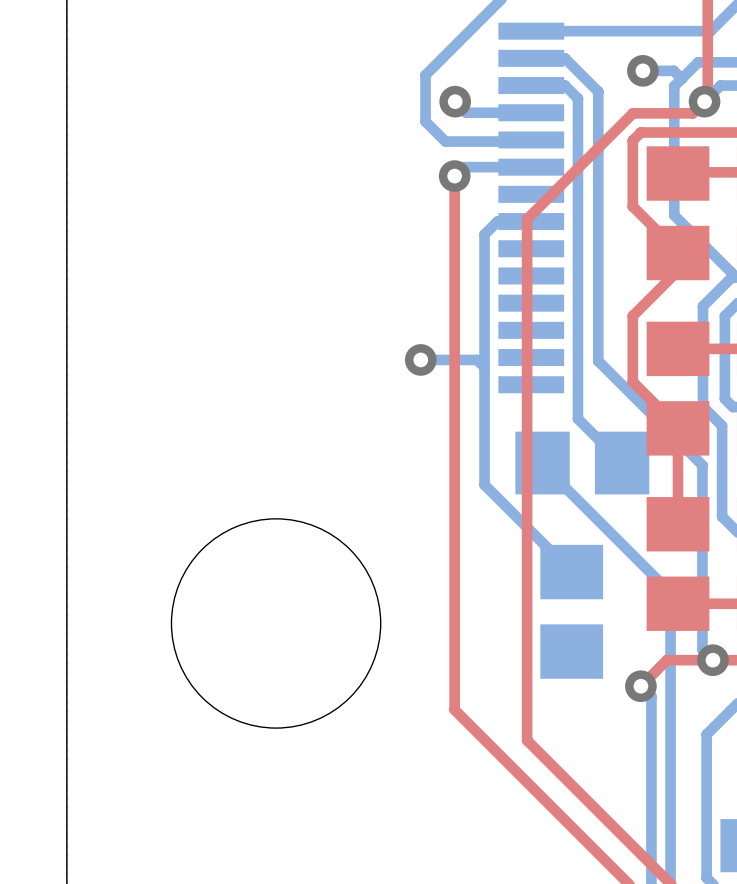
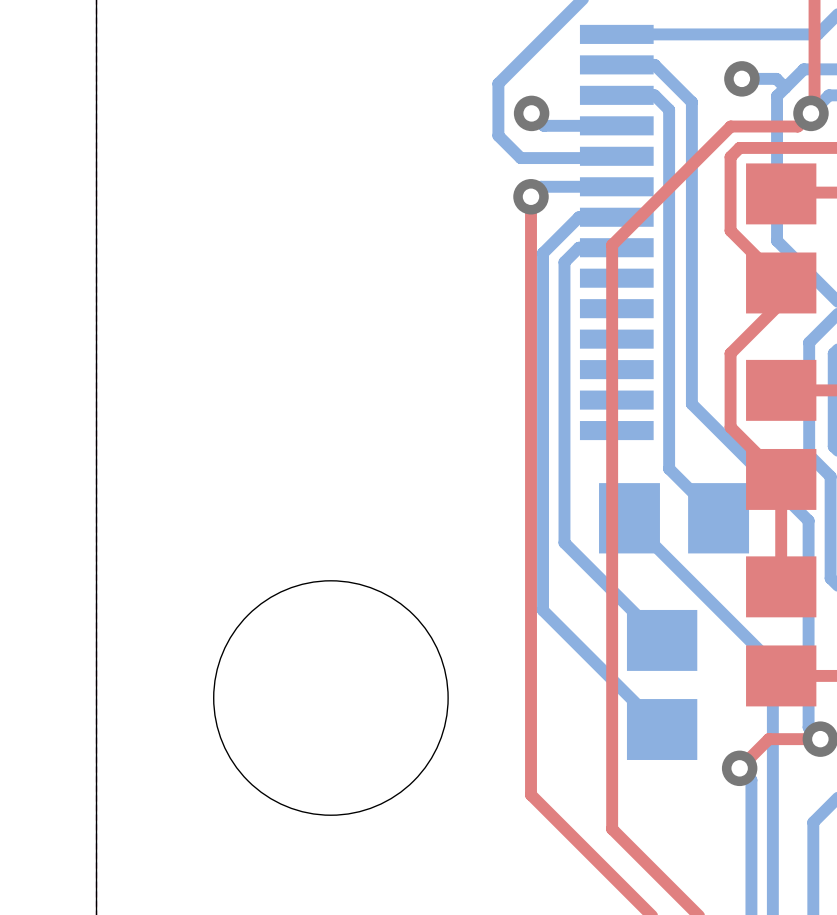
bottom track: none -> (616, 217) (579, 217) (543, 253) (543, 610) (662, 729)
bottom track: (420, 359) (477, 359) (484, 367) -> none
via: (420, 359) -> none

